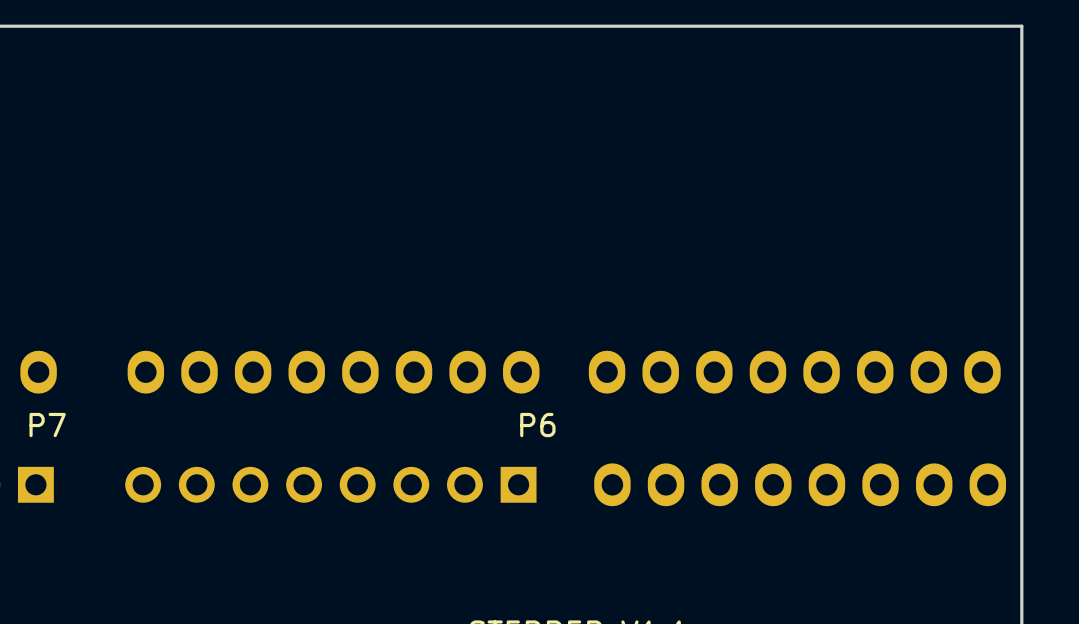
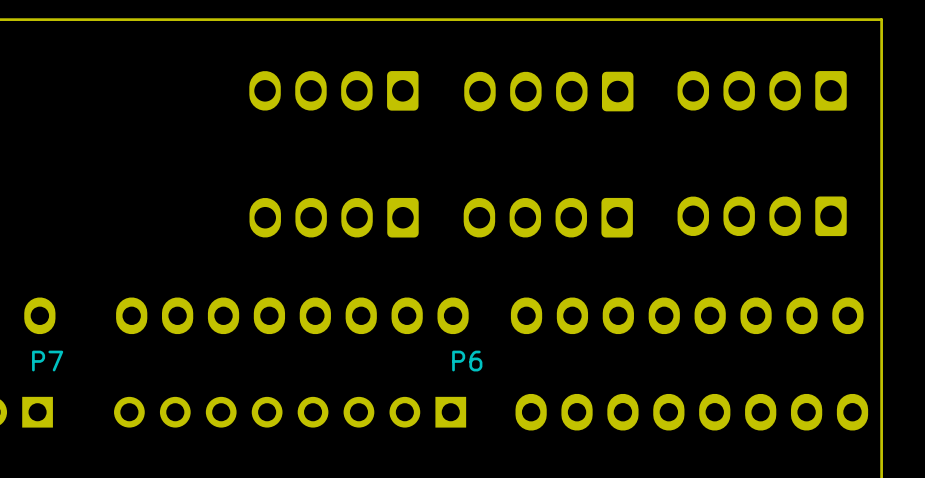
part: none -> (333, 90)
part: none -> (762, 90)
part: none -> (548, 91)
part: none -> (762, 216)
part: none -> (334, 217)
part: none -> (548, 217)

